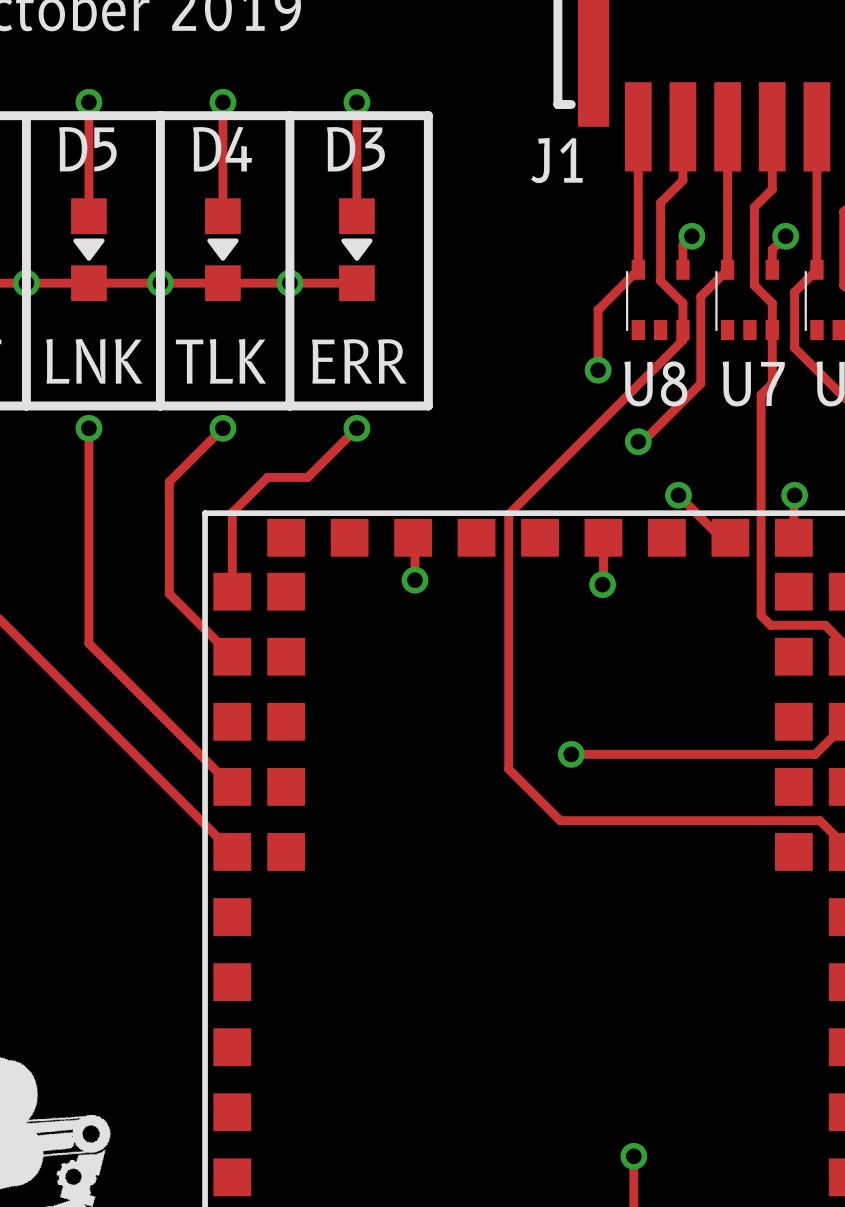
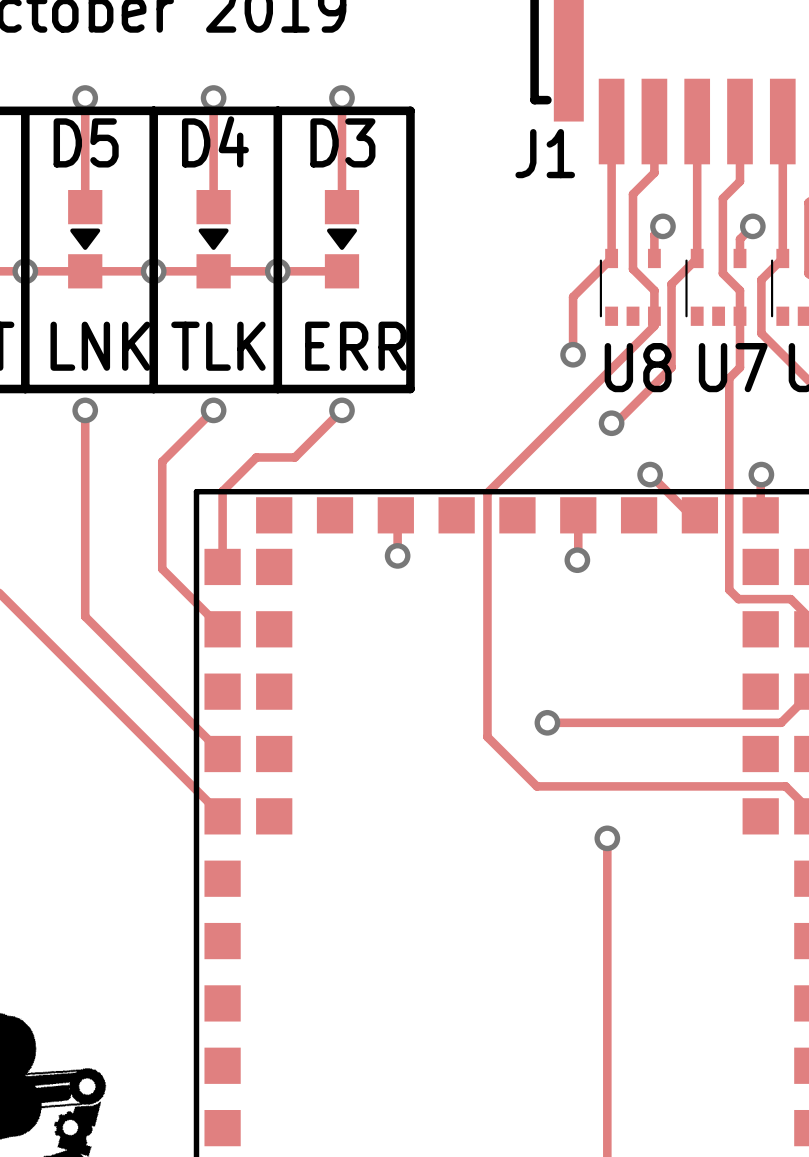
track: none -> (607, 838) (607, 1107)
via: none -> (607, 838)
via: (633, 1156) -> none

